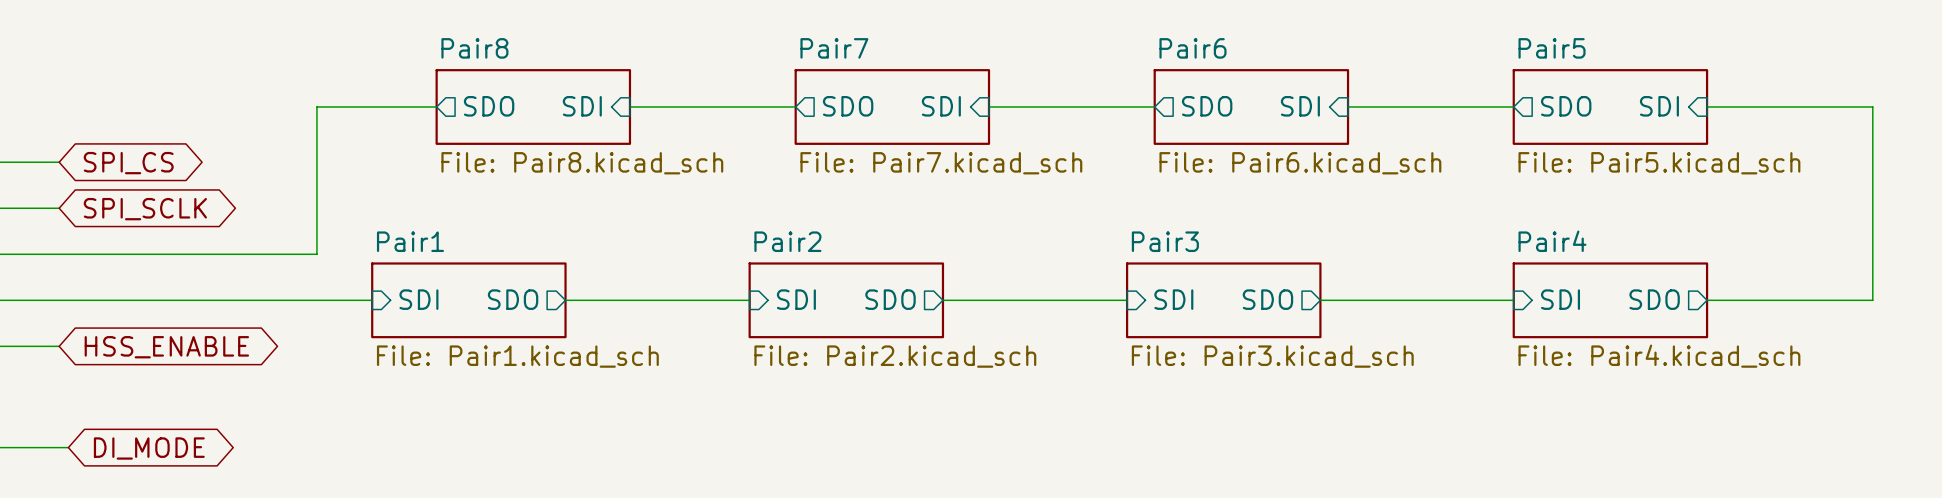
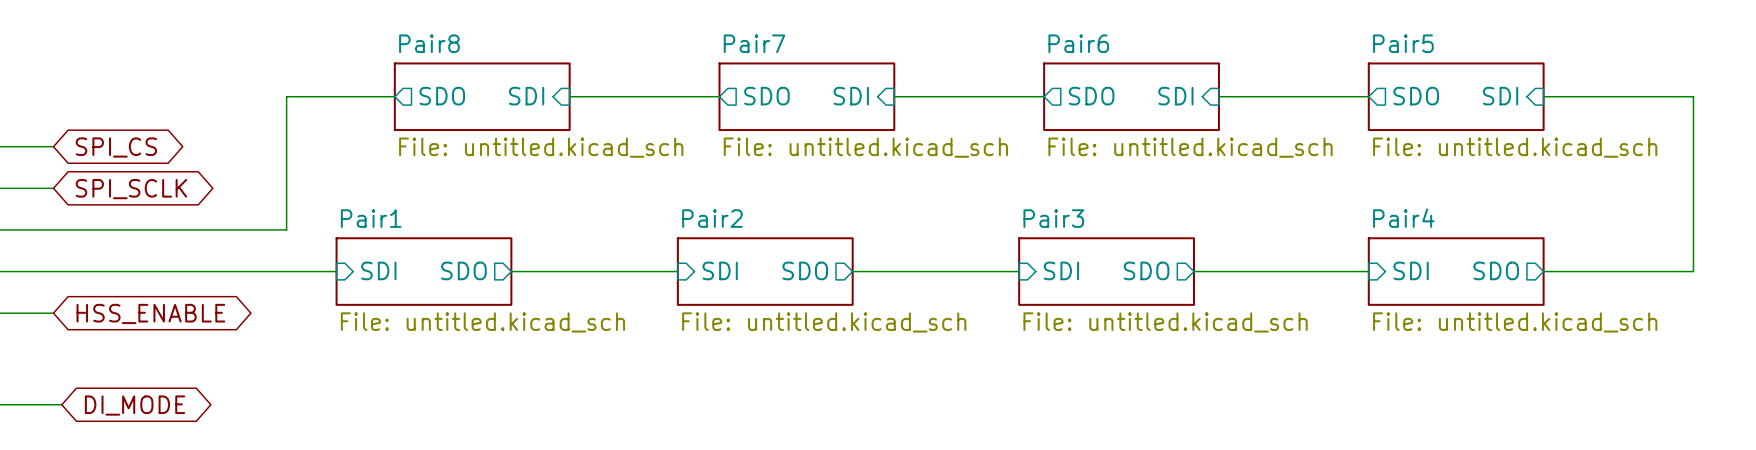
sheet Pair8 value: File: Pair8.kicad_sch (582, 163) -> File: untitled.kicad_sch (541, 147)
sheet Pair7 value: File: Pair7.kicad_sch (941, 163) -> File: untitled.kicad_sch (865, 147)
sheet Pair6 value: File: Pair6.kicad_sch (1300, 163) -> File: untitled.kicad_sch (1190, 147)
sheet Pair5 value: File: Pair5.kicad_sch (1659, 163) -> File: untitled.kicad_sch (1515, 147)
sheet Pair1 value: File: Pair1.kicad_sch (517, 356) -> File: untitled.kicad_sch (482, 322)
sheet Pair2 value: File: Pair2.kicad_sch (895, 356) -> File: untitled.kicad_sch (824, 322)
sheet Pair3 value: File: Pair3.kicad_sch (1272, 356) -> File: untitled.kicad_sch (1165, 322)
sheet Pair4 value: File: Pair4.kicad_sch (1659, 356) -> File: untitled.kicad_sch (1515, 322)

